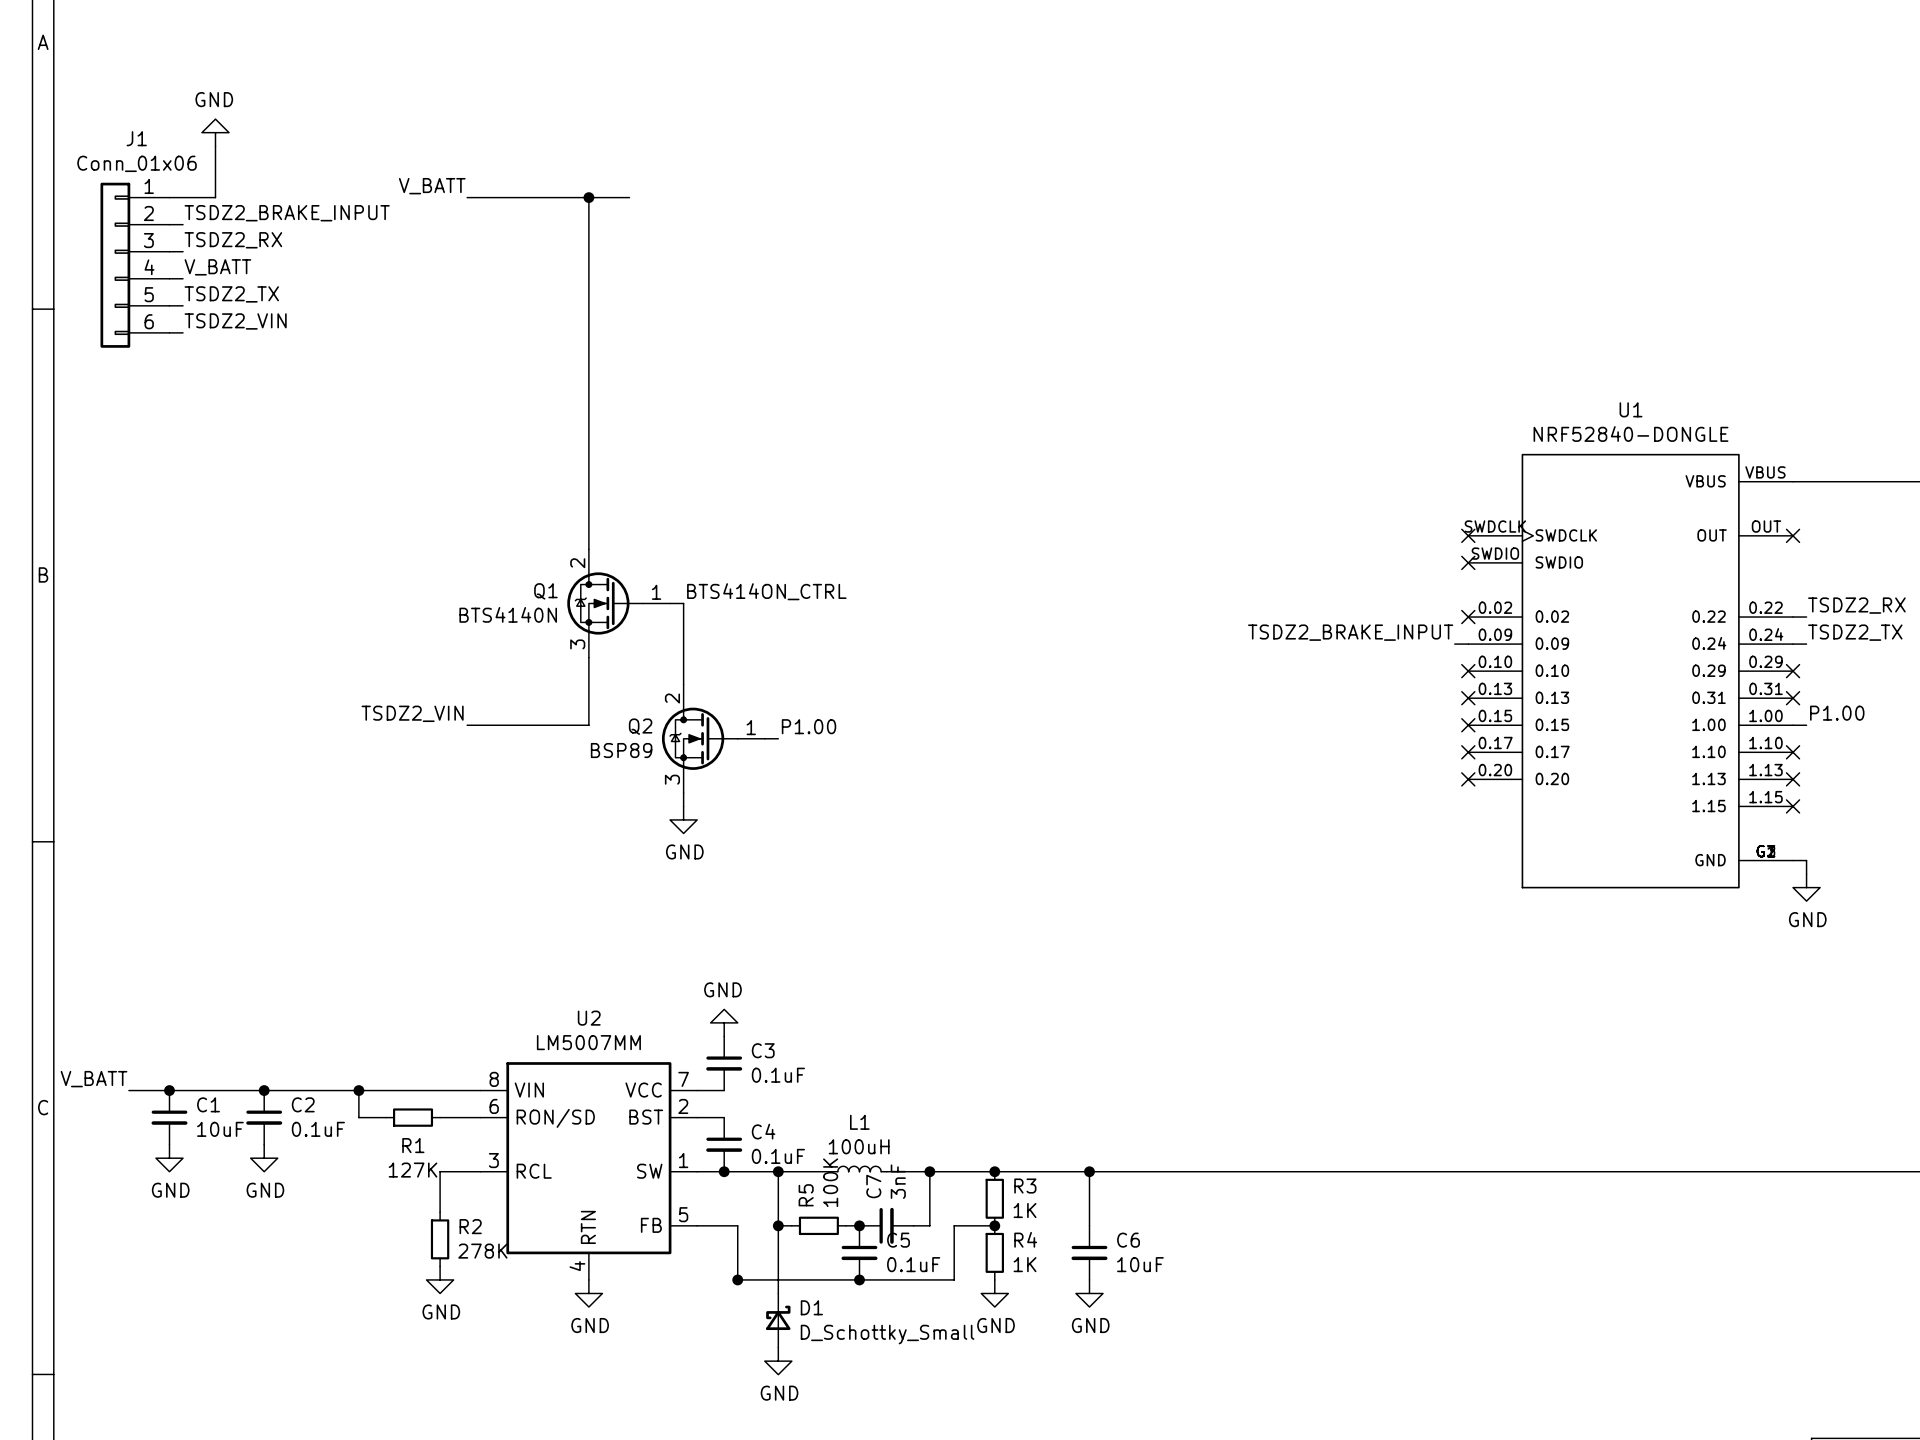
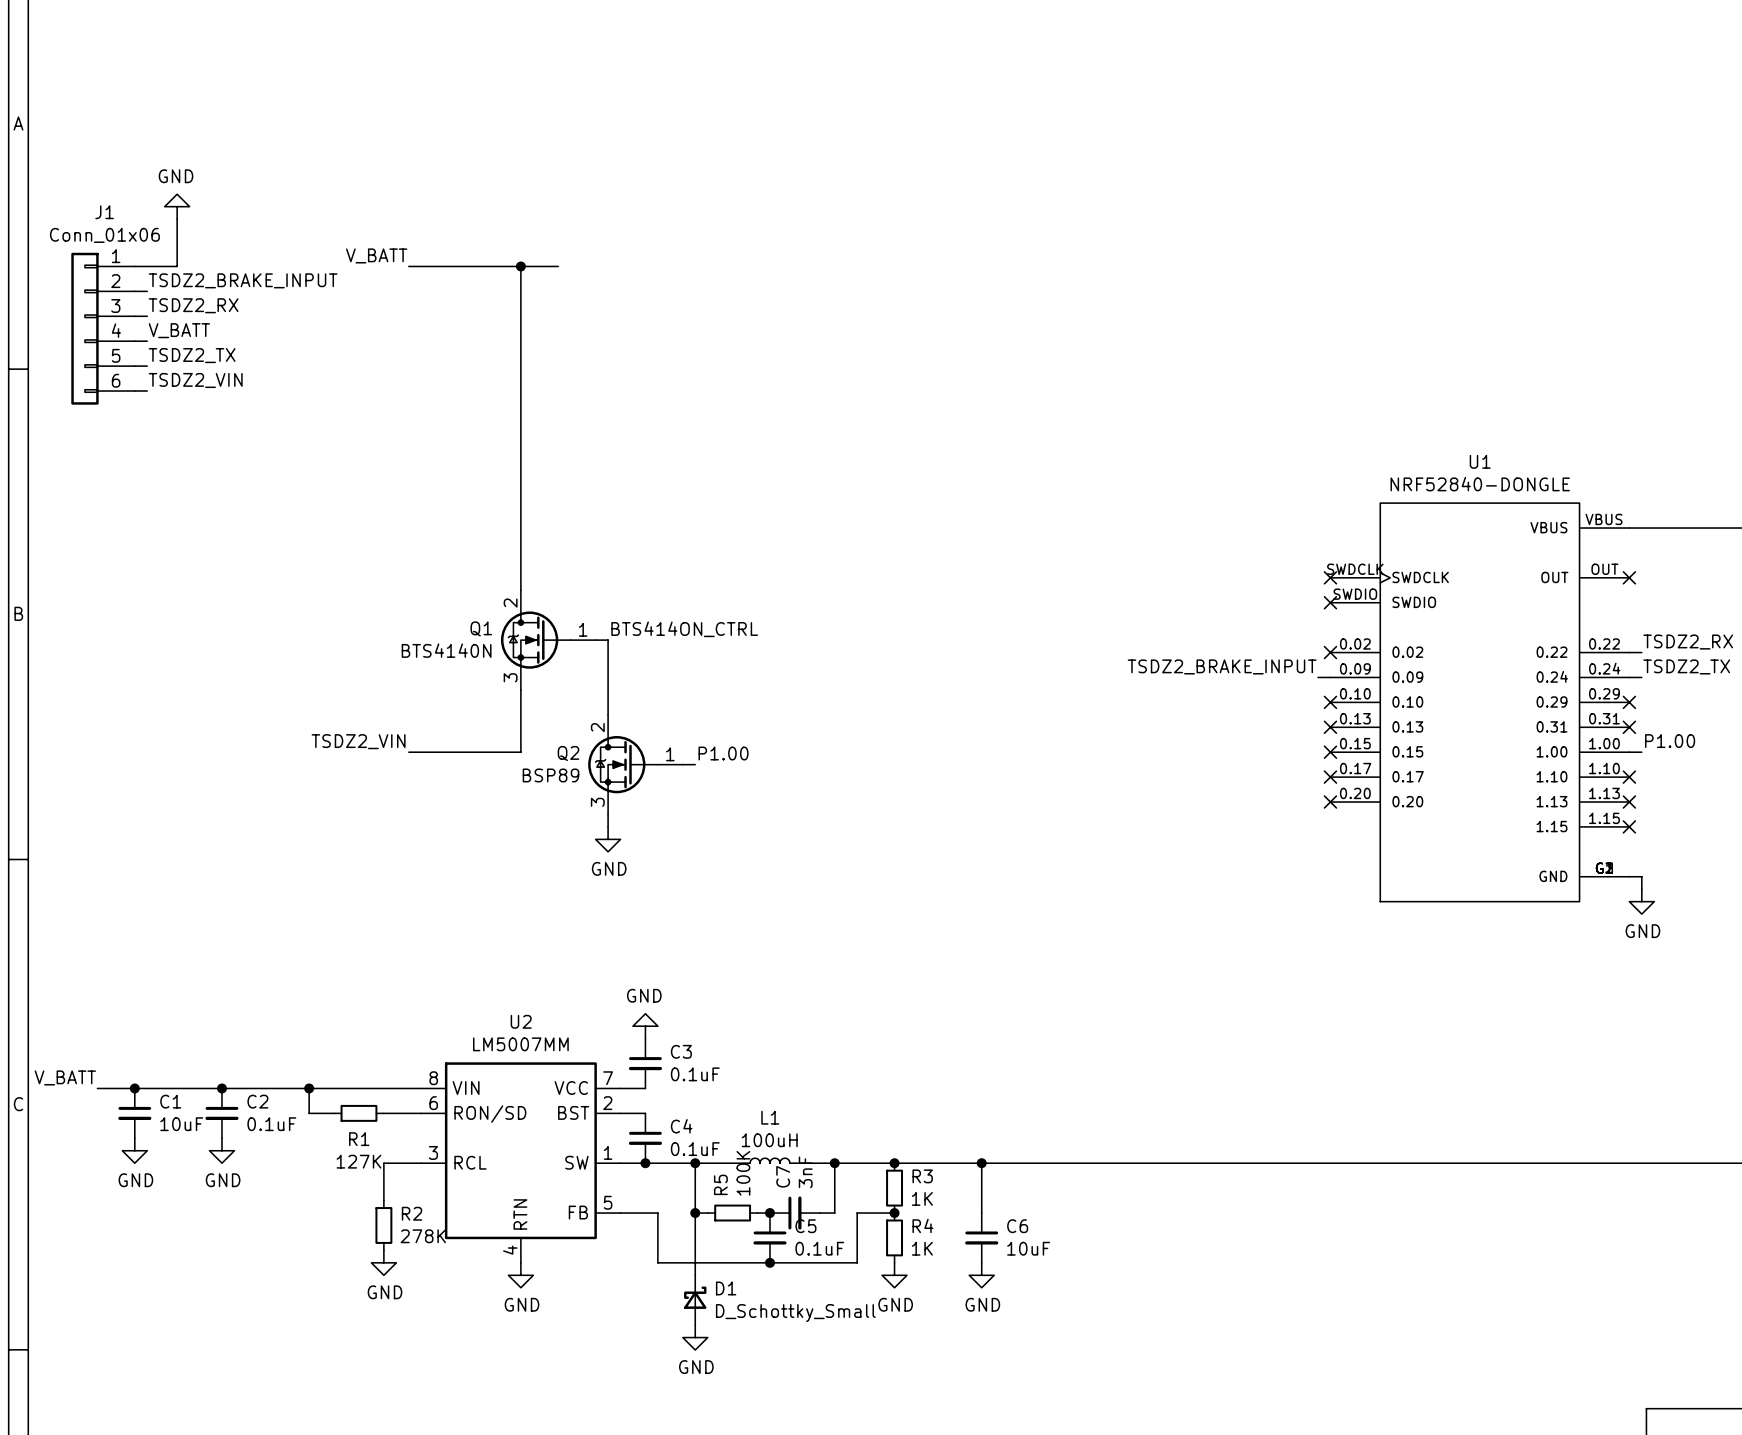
junction: (737, 1279) -> none

